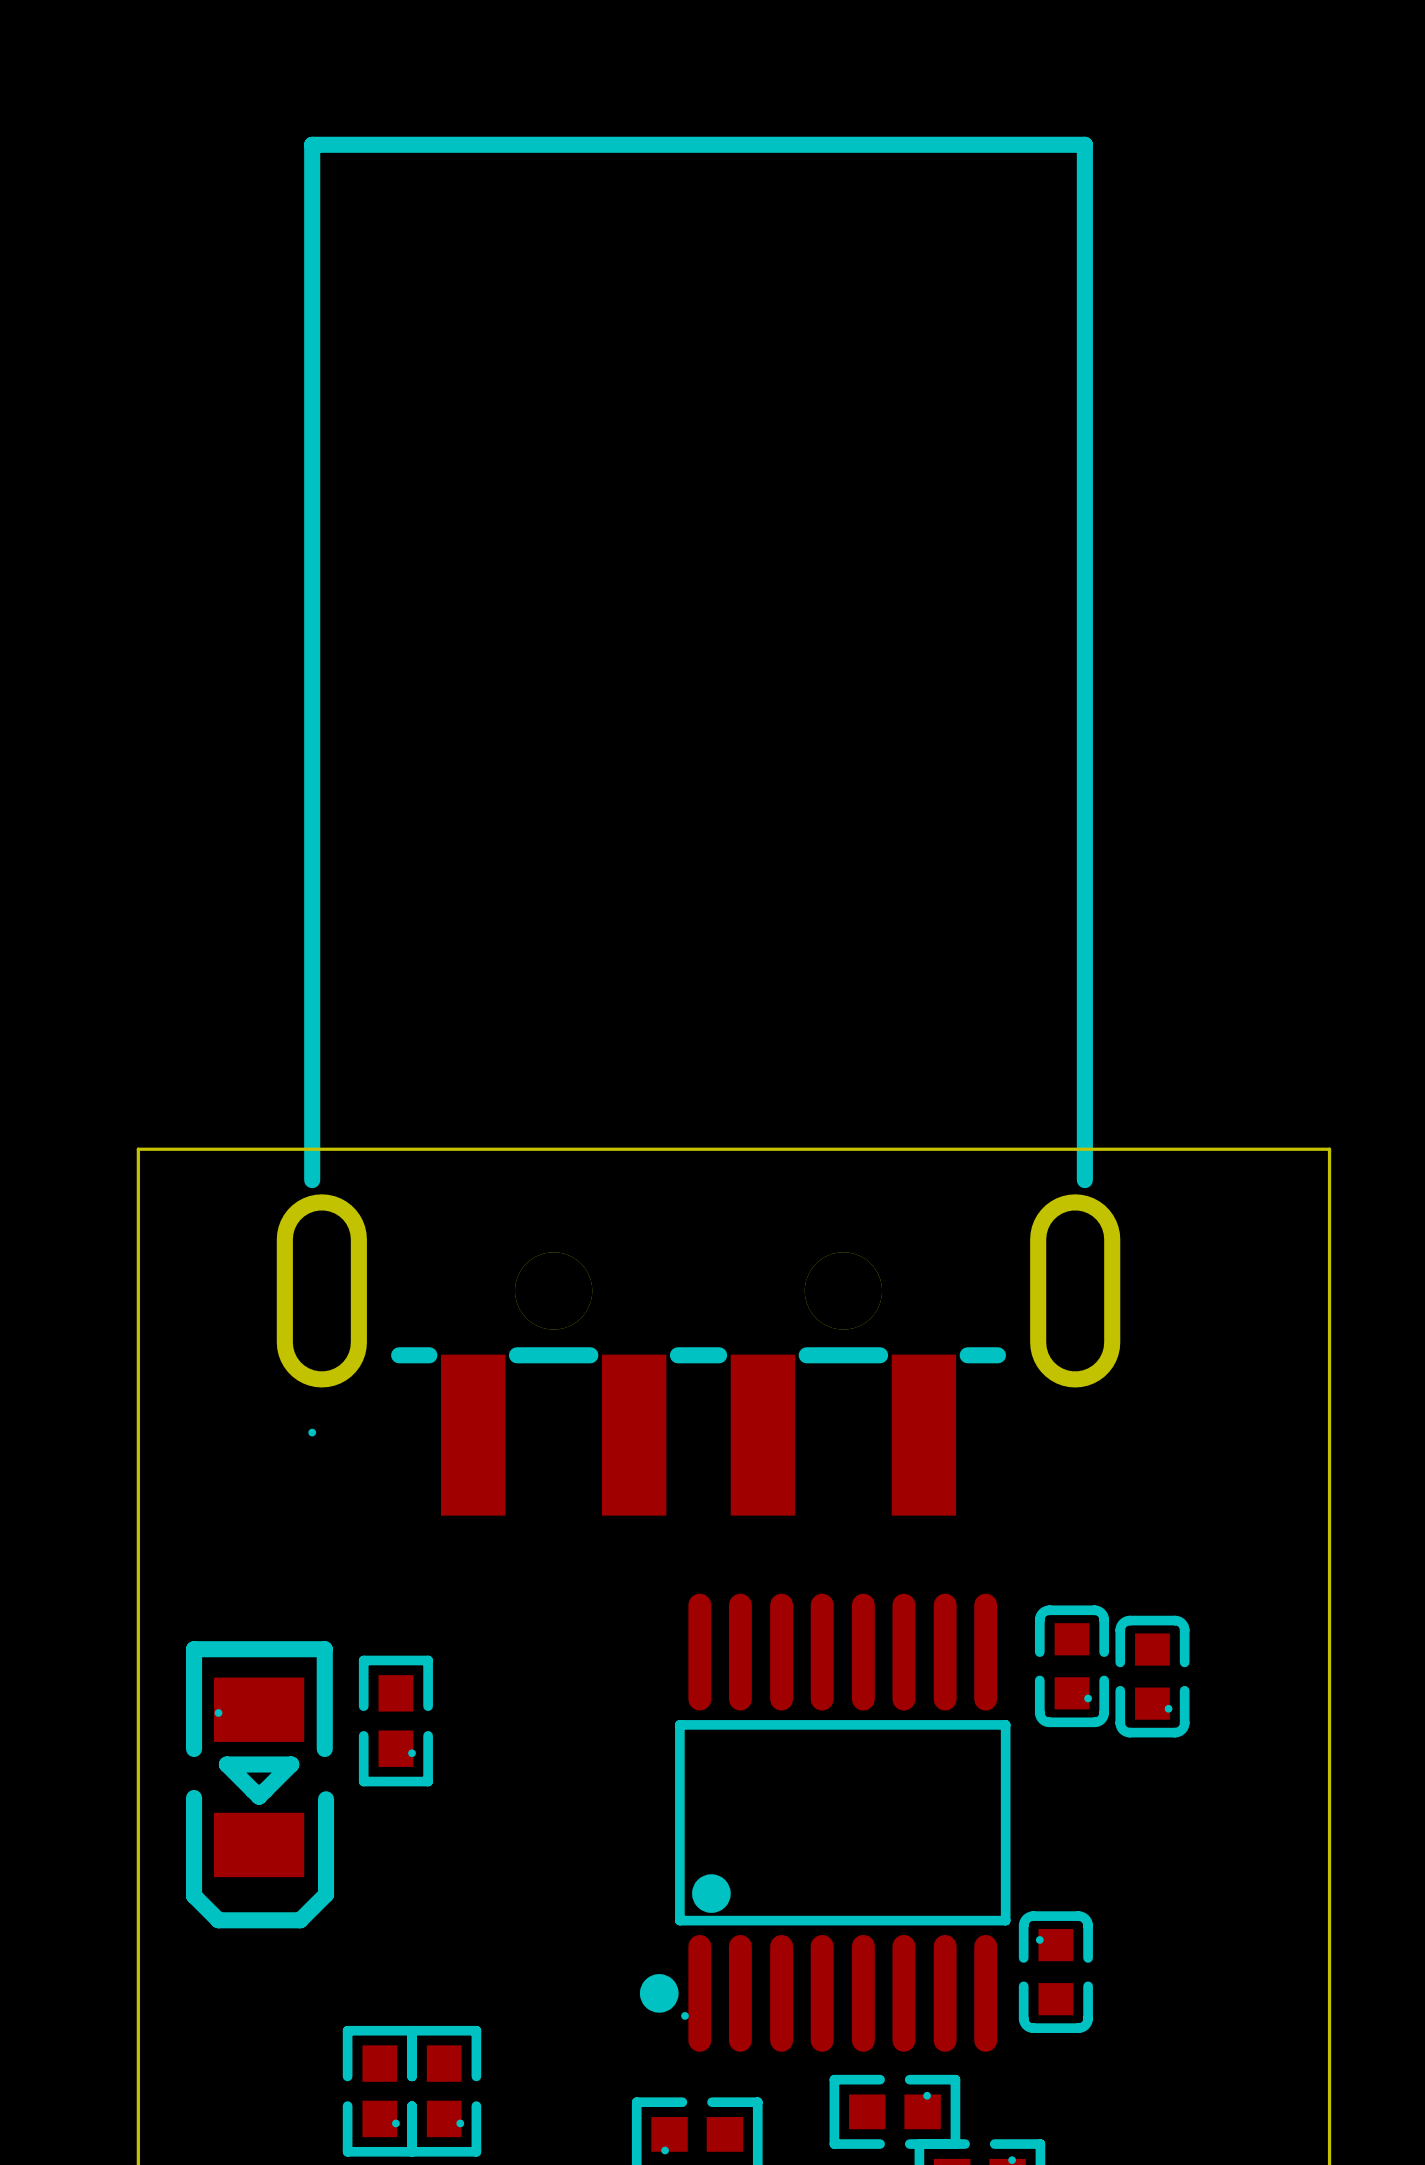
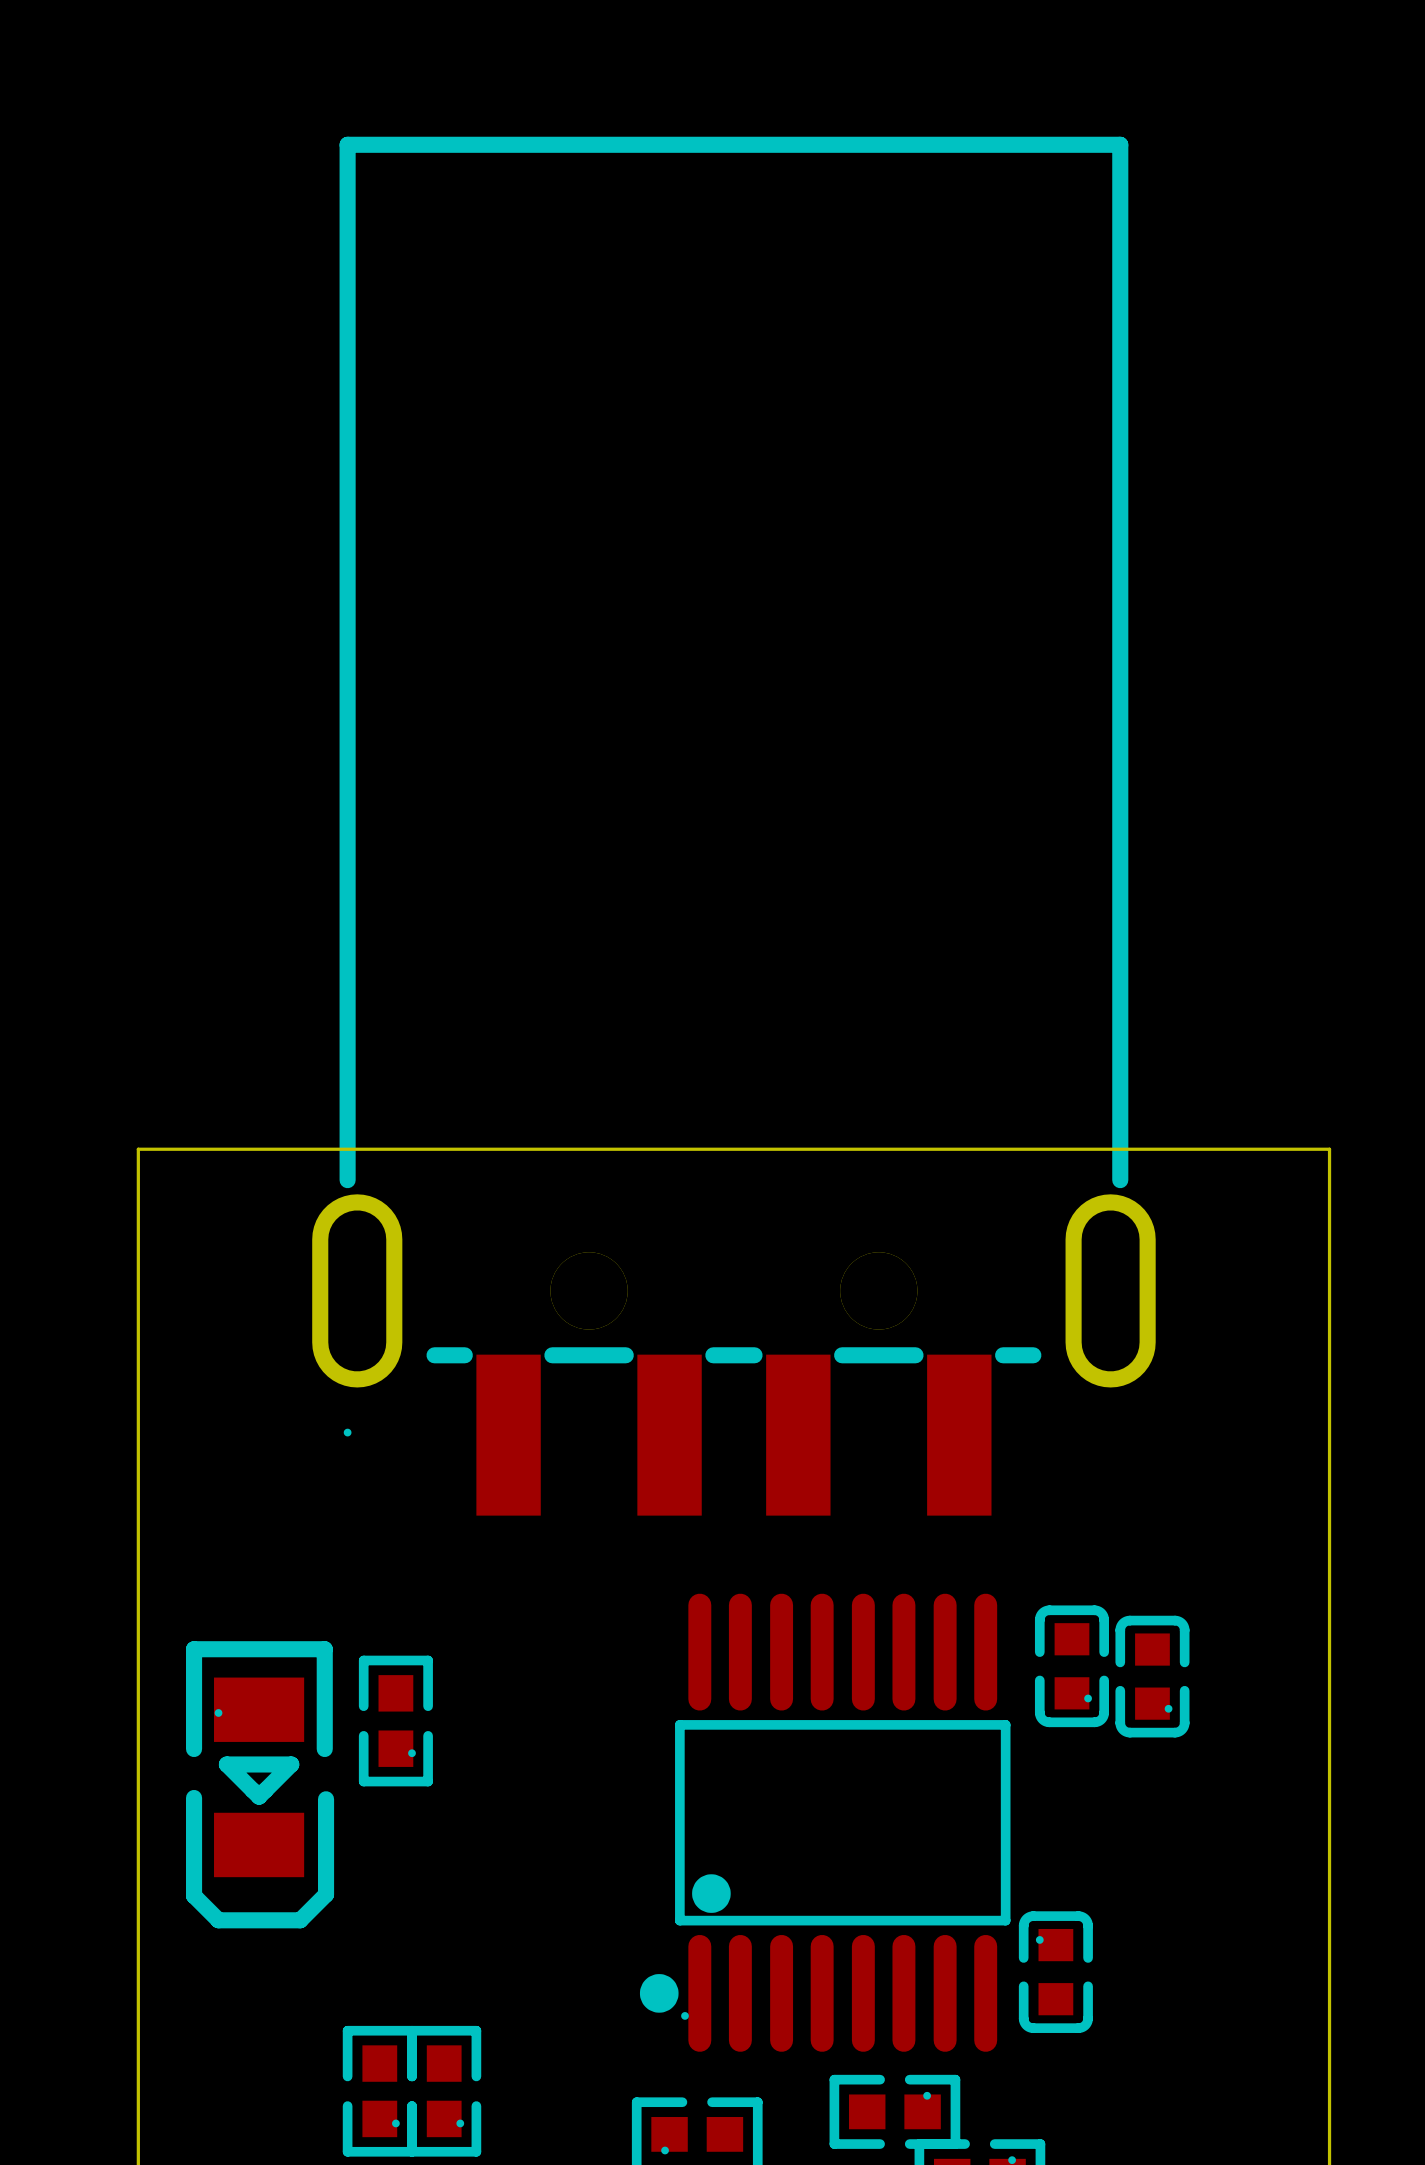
part position: (698, 826) -> (733, 826)

